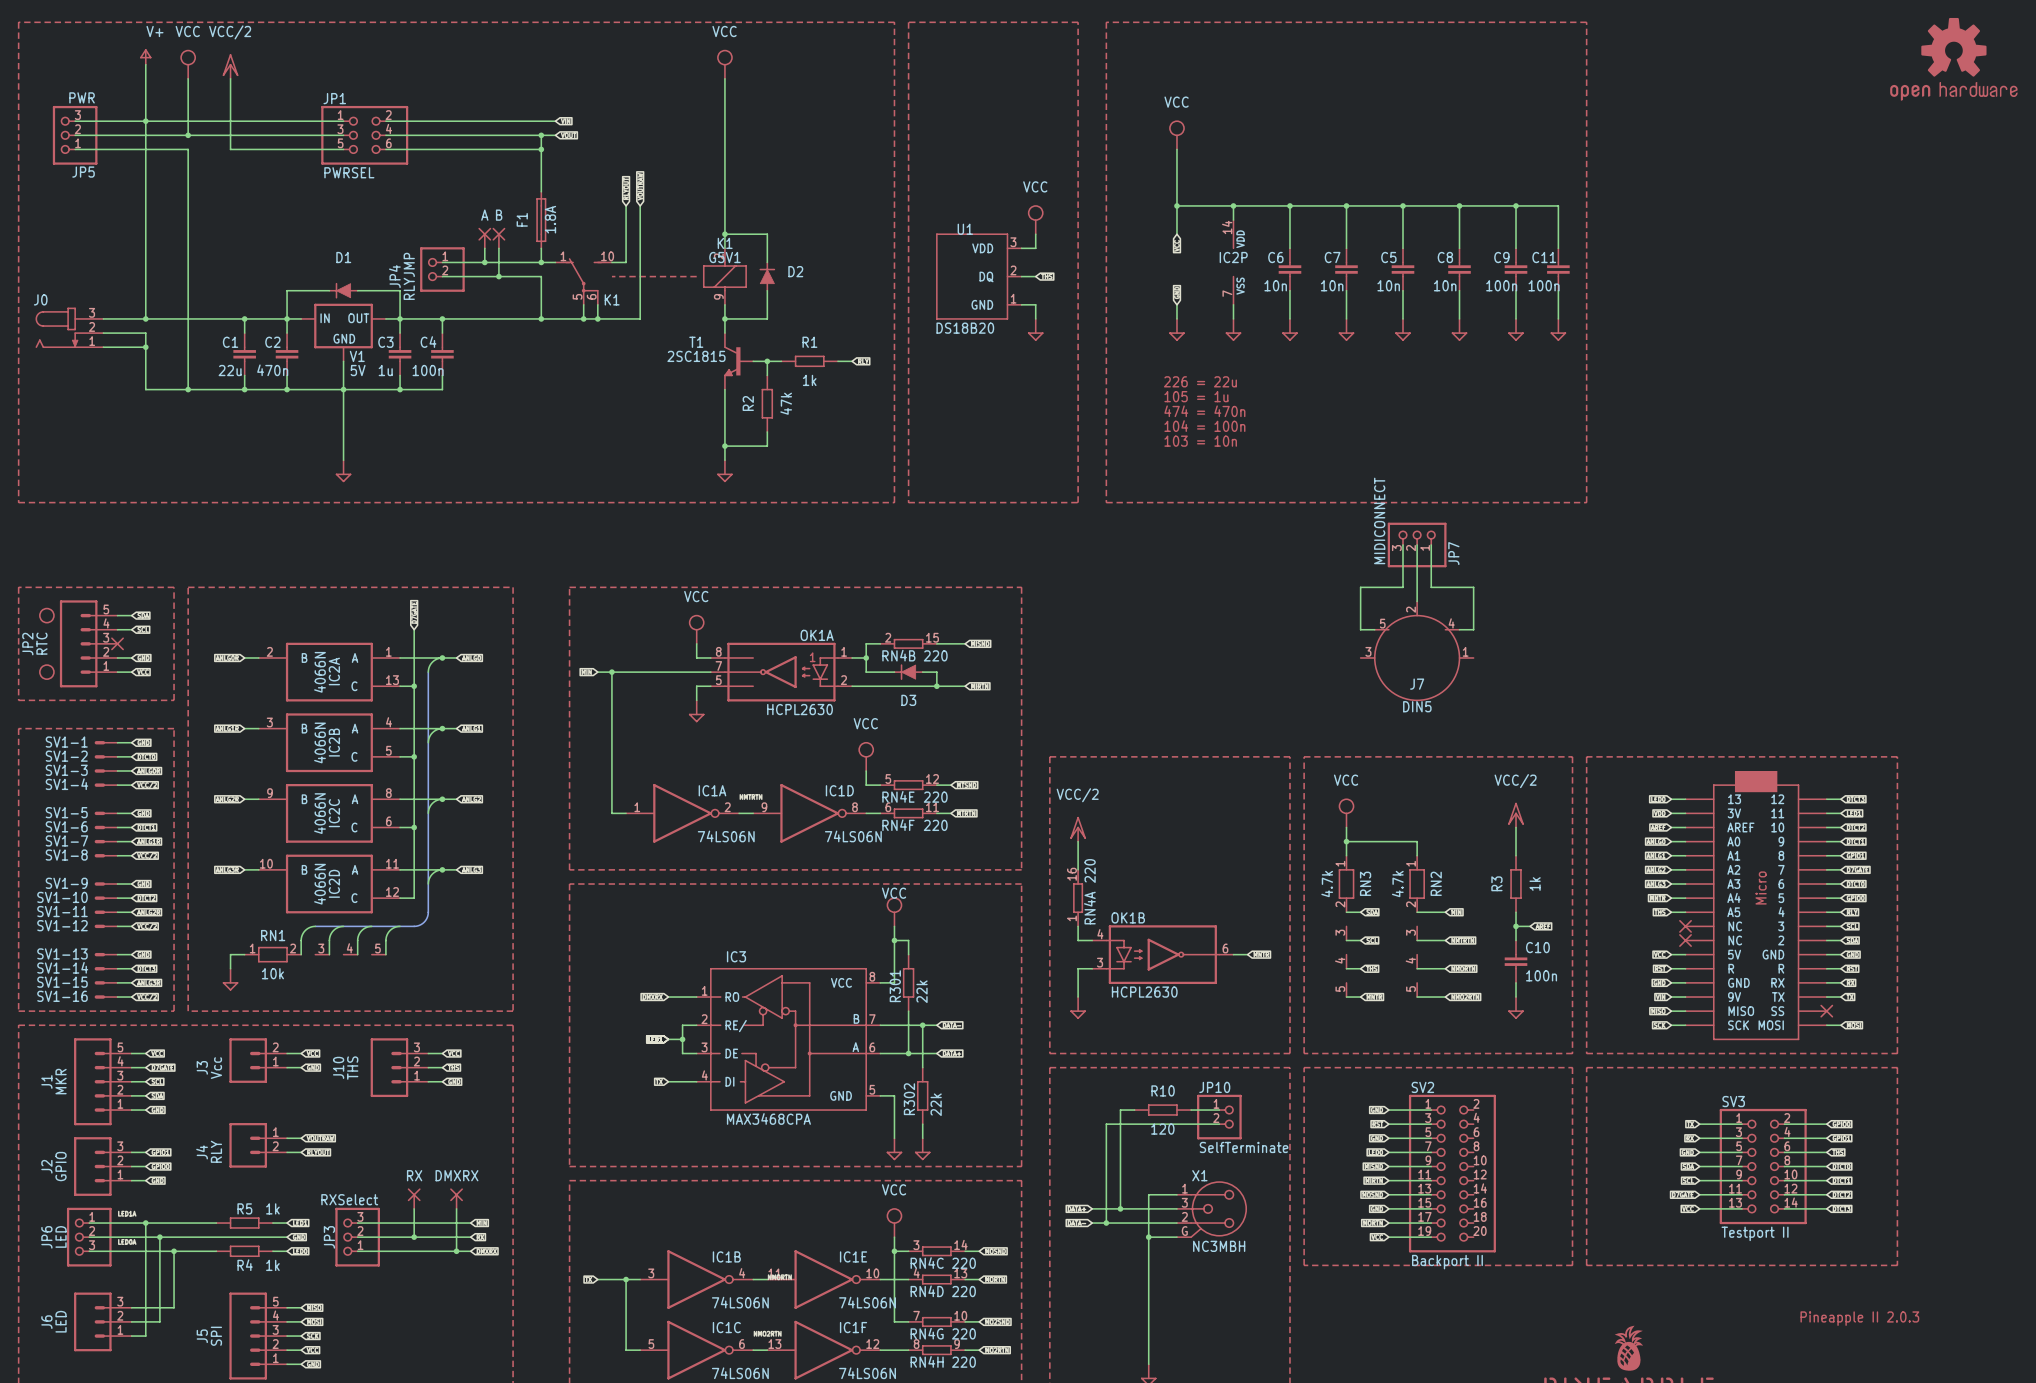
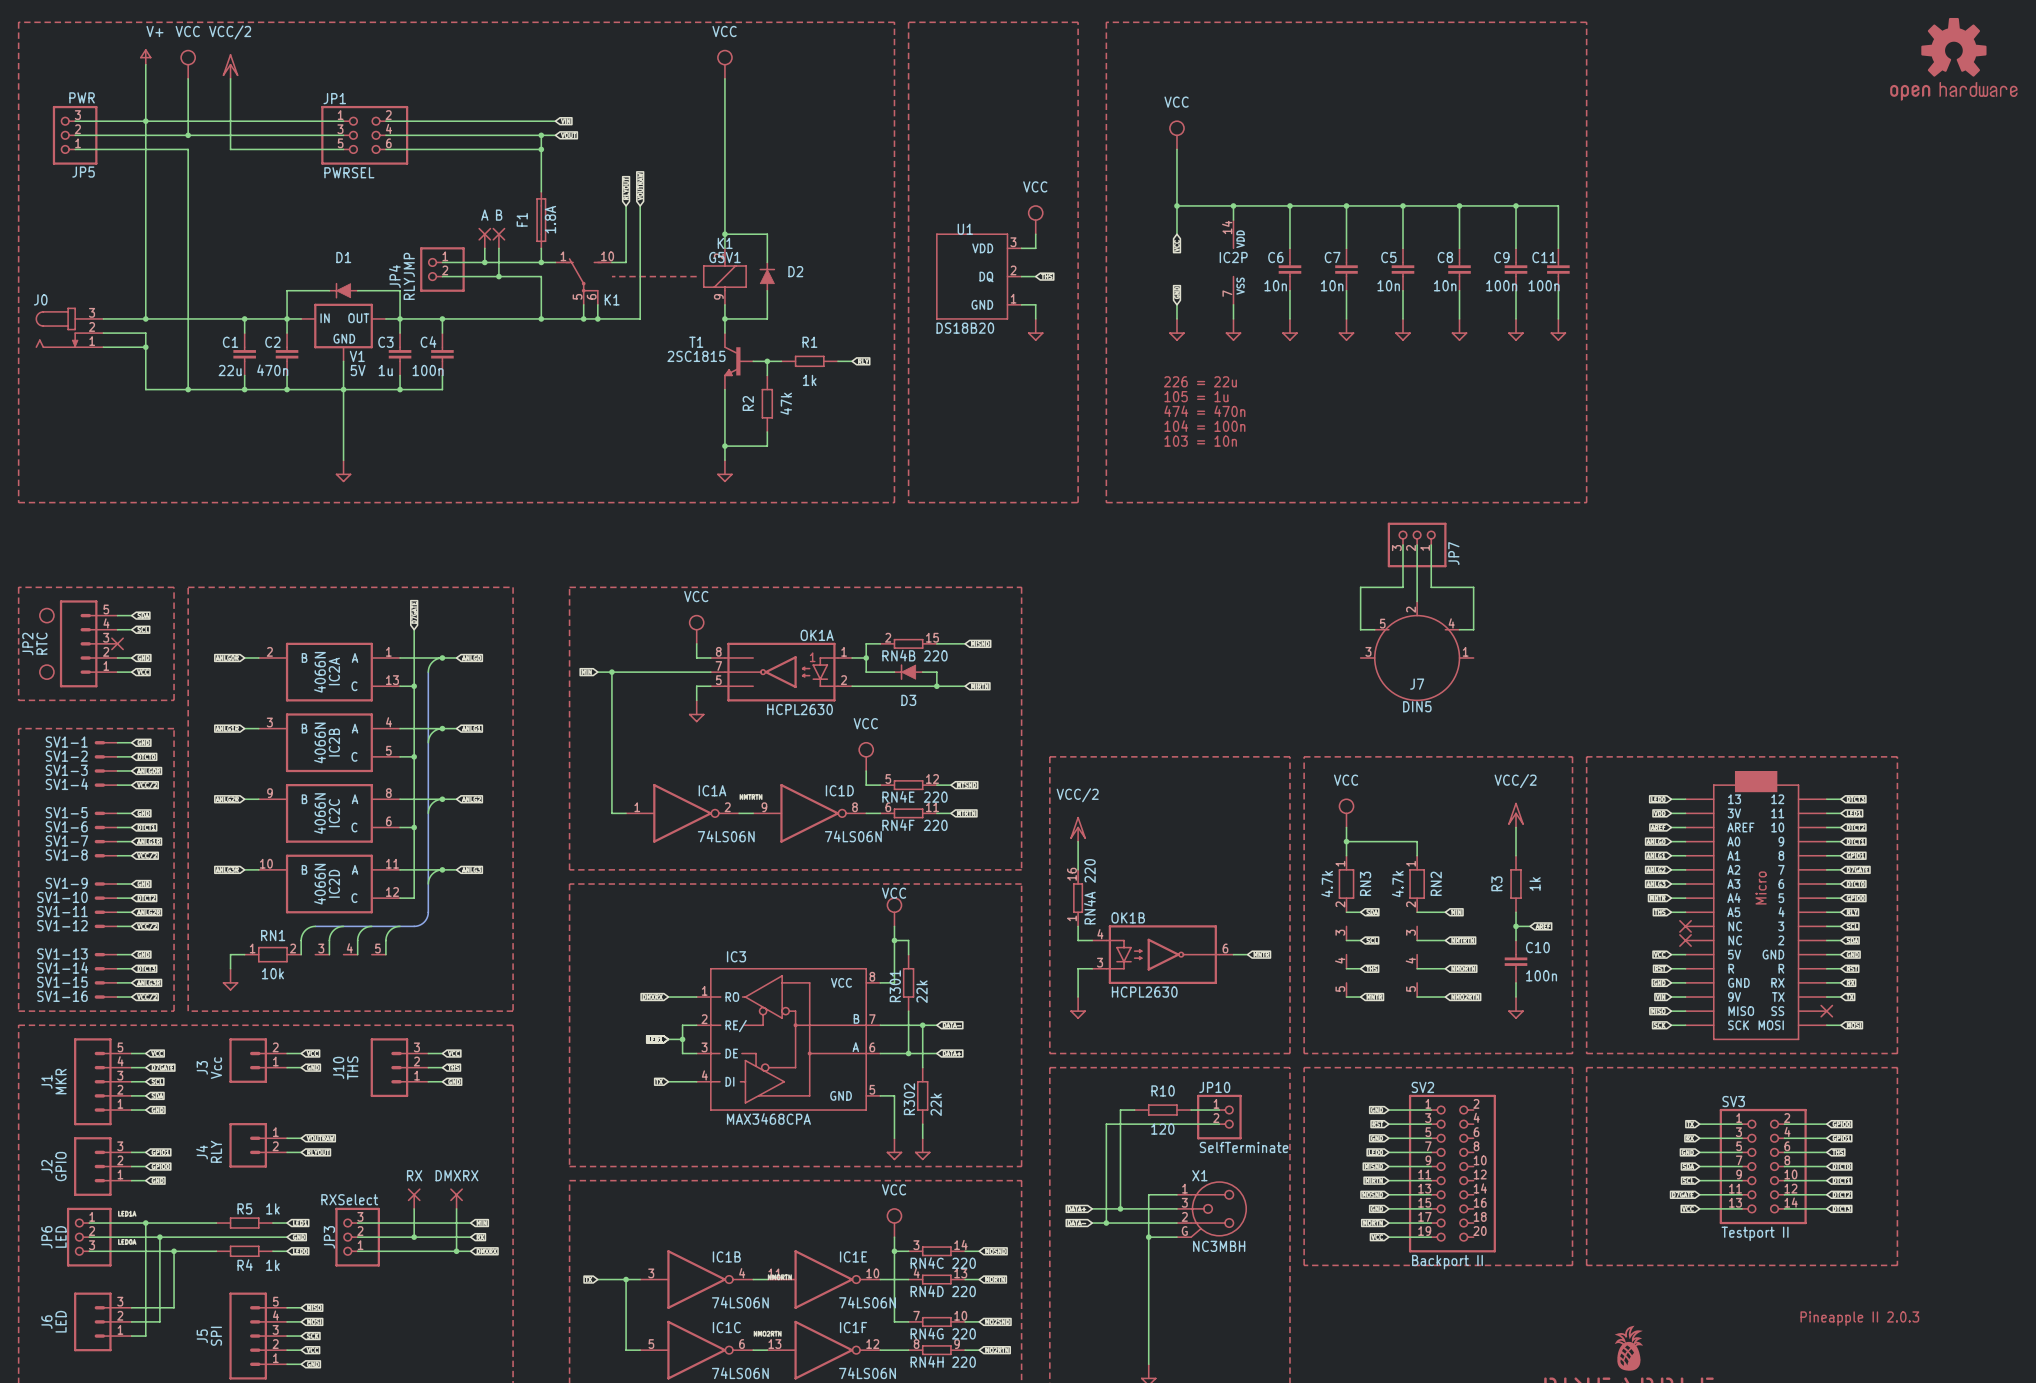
JP7 value: MIDICONNECT (1379, 520) -> none

